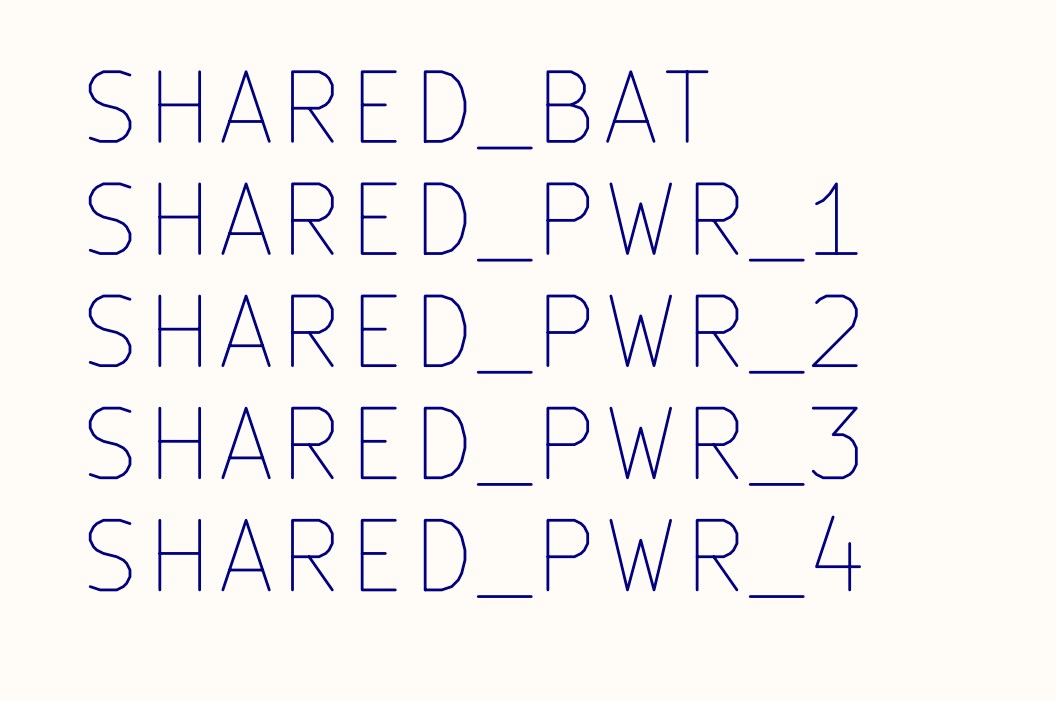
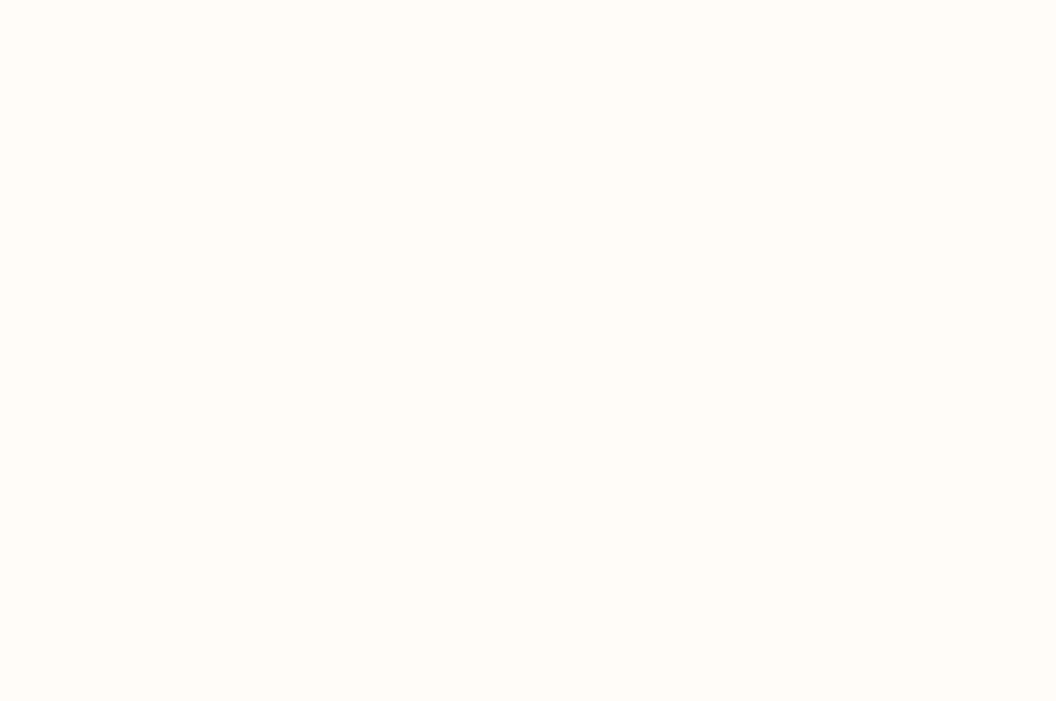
text: SHARED_BAT (398, 109) -> none
text: SHARED_PWR_1 (473, 222) -> none
text: SHARED_PWR_2 (473, 334) -> none
text: SHARED_PWR_3 (473, 446) -> none
text: SHARED_PWR_4 (474, 556) -> none

